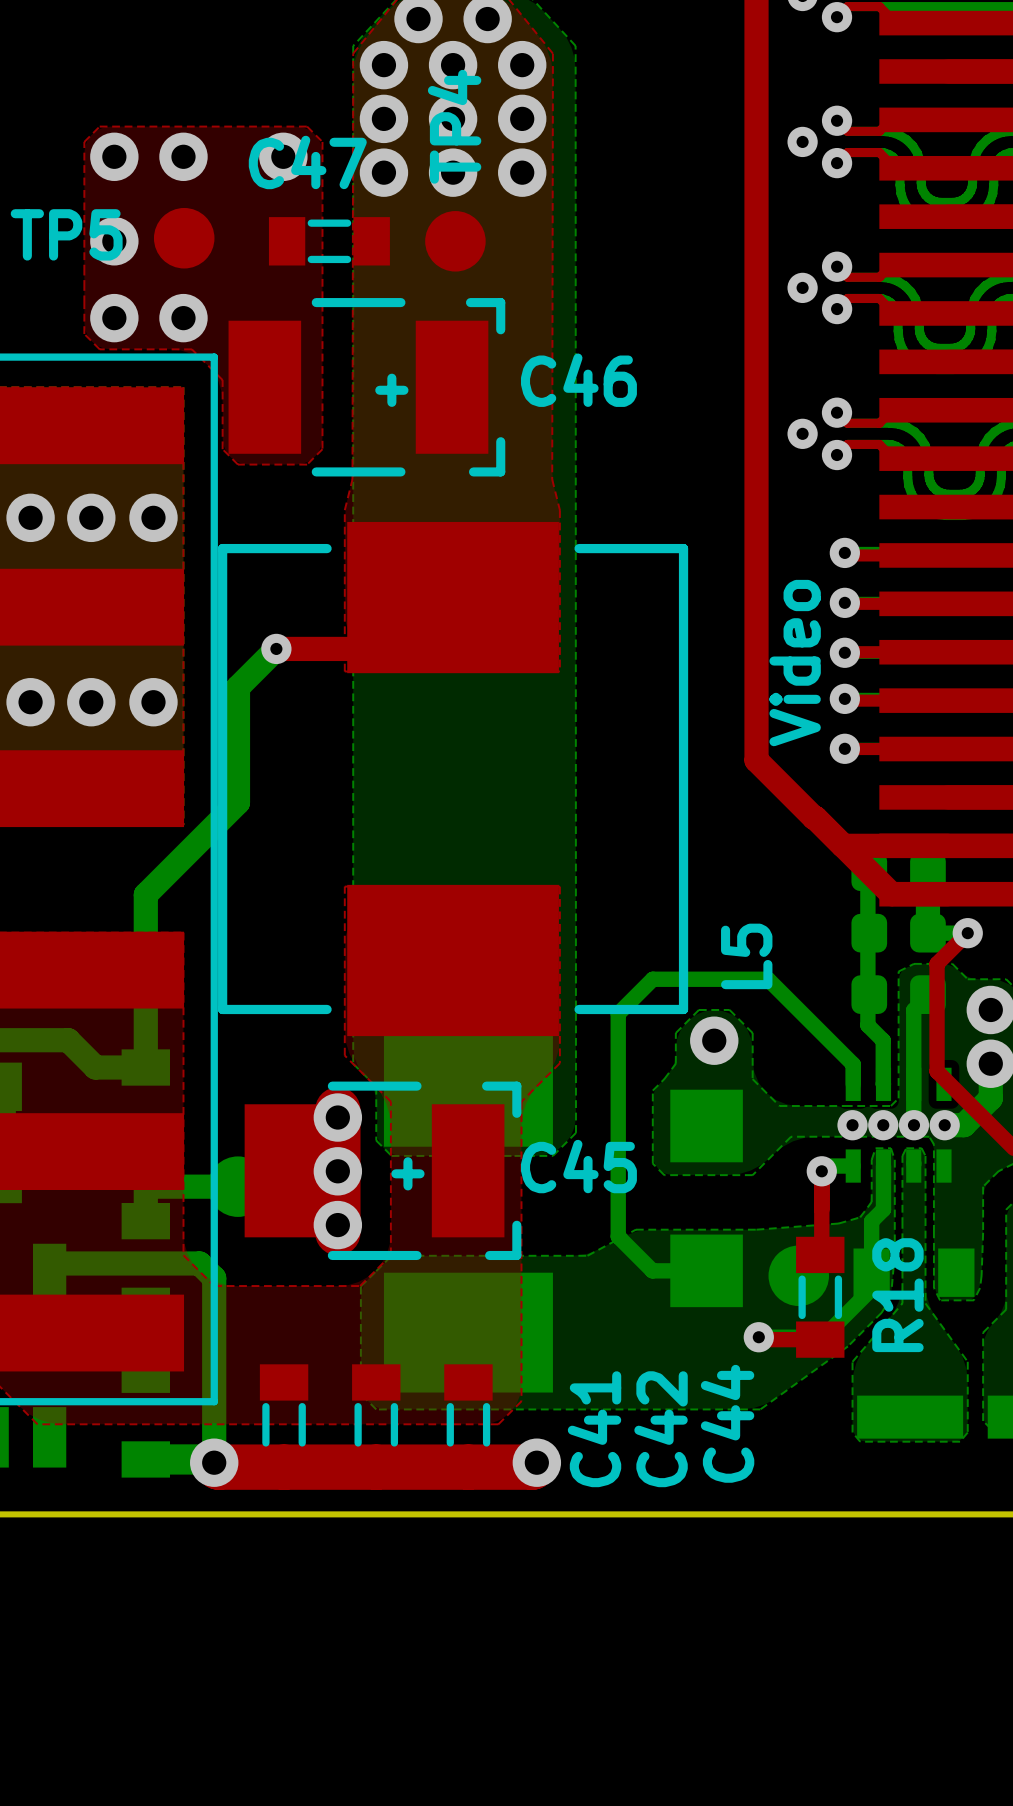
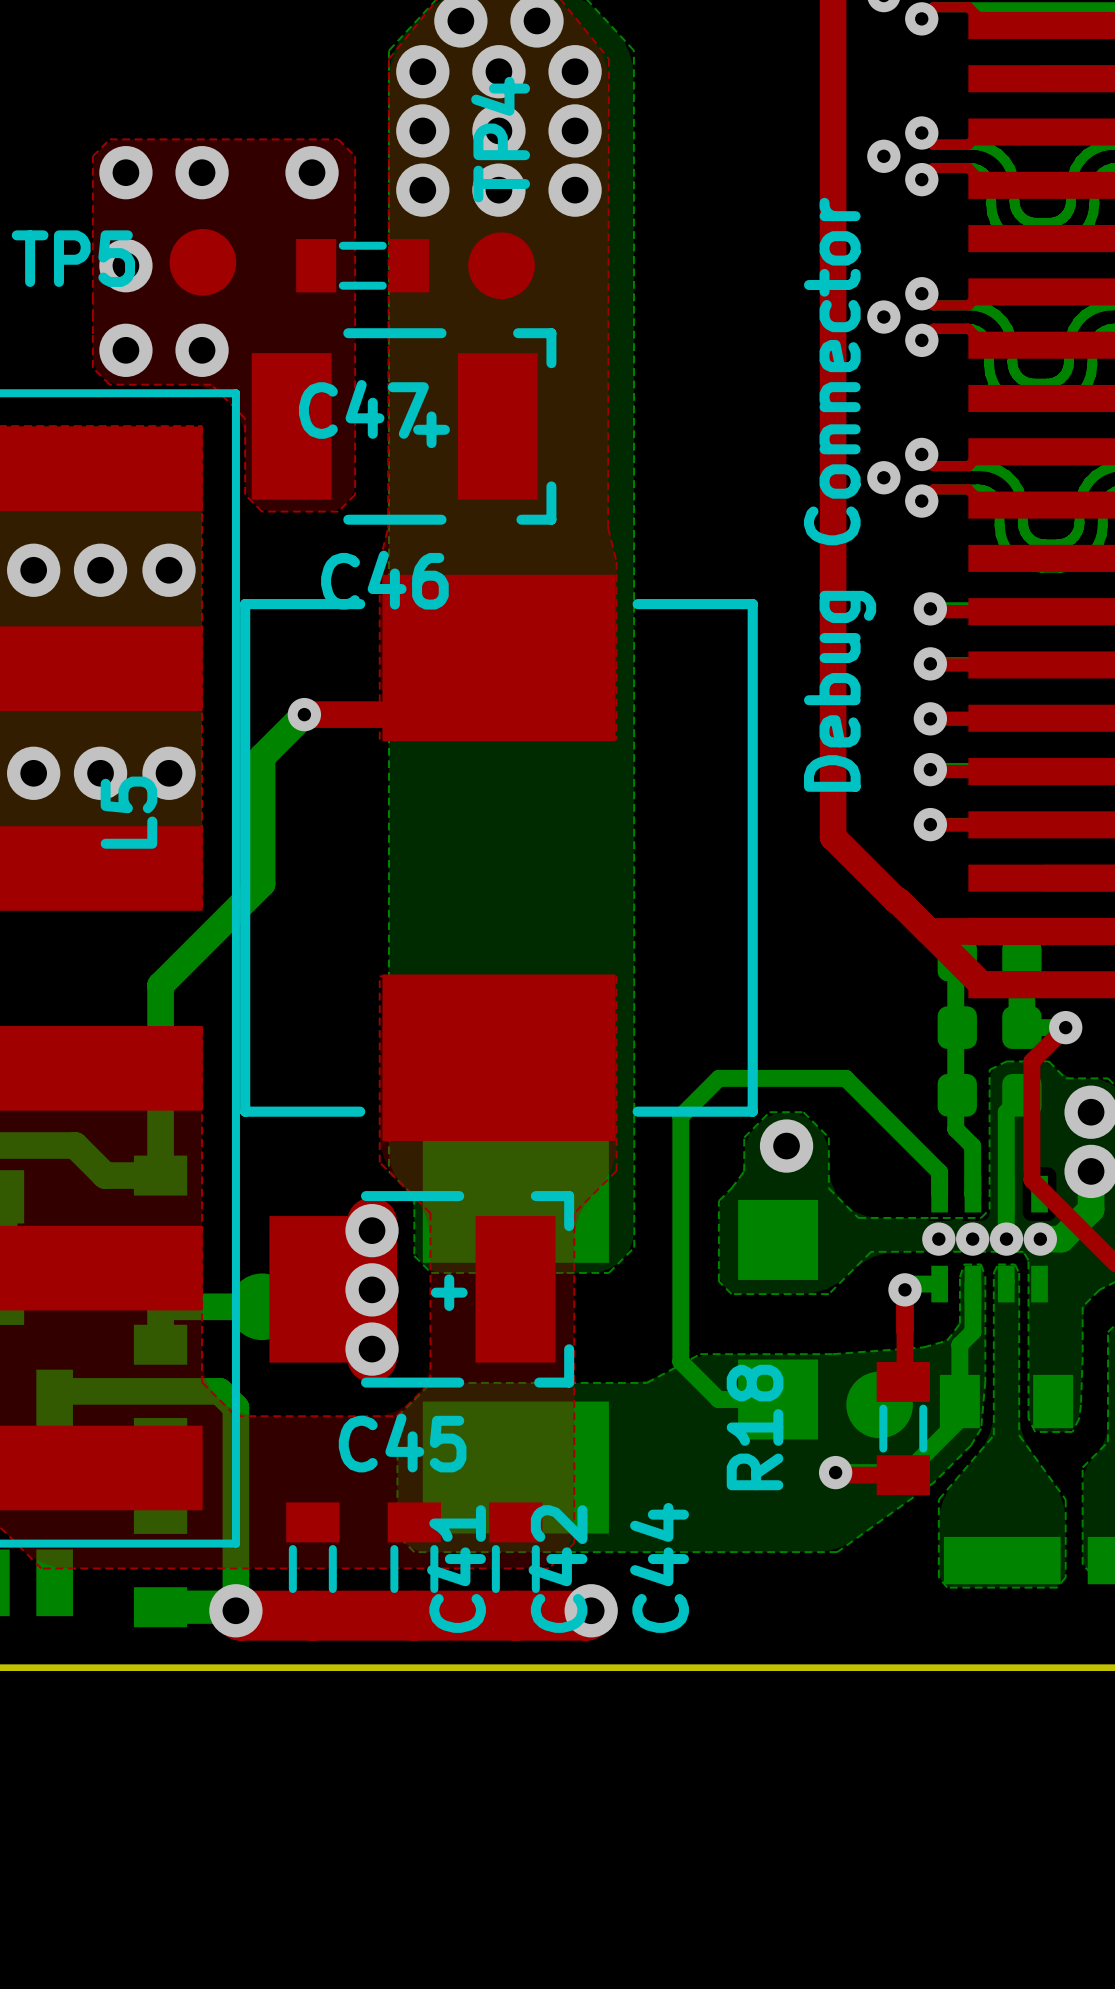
C47 name position: C47 (307, 162) -> C47 (363, 409)
C46 name position: C46 (578, 380) -> C46 (384, 580)
text: none -> Debug Connector (840, 494)
text: Video (795, 663) -> none
L5 name position: L5 (746, 956) -> L5 (128, 812)
C45 name position: C45 (578, 1166) -> C45 (402, 1442)
R18 name position: R18 (897, 1295) -> R18 (755, 1427)
C44 name position: C44 (727, 1423) -> C44 (659, 1567)
C41 name position: C41 (594, 1429) -> C41 (456, 1569)
C42 name position: C42 (661, 1429) -> C42 (558, 1569)

